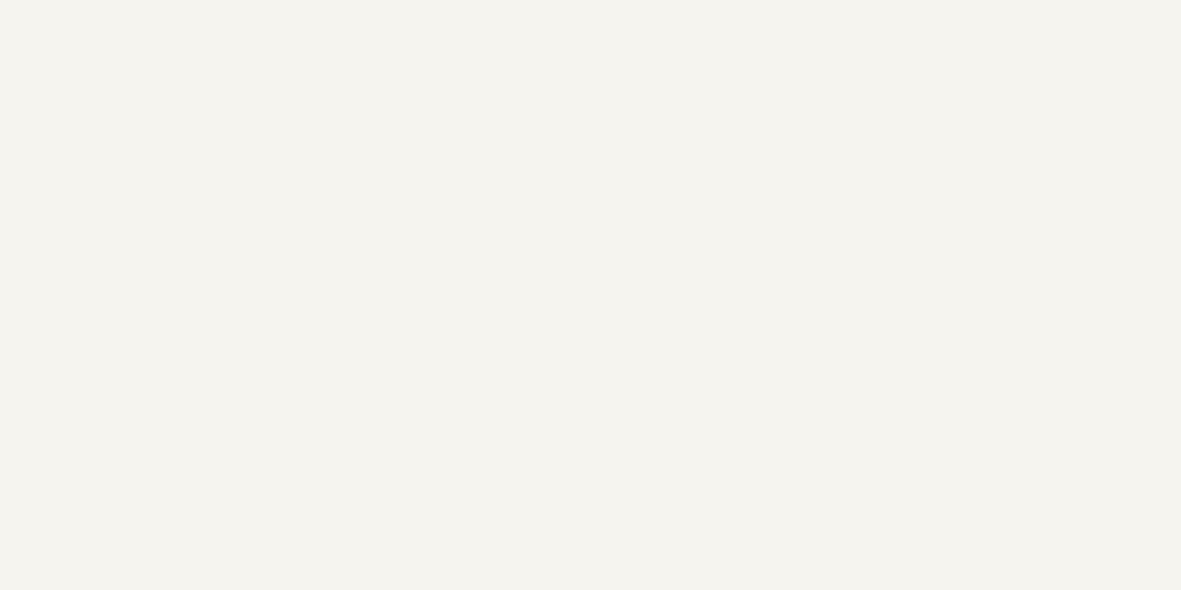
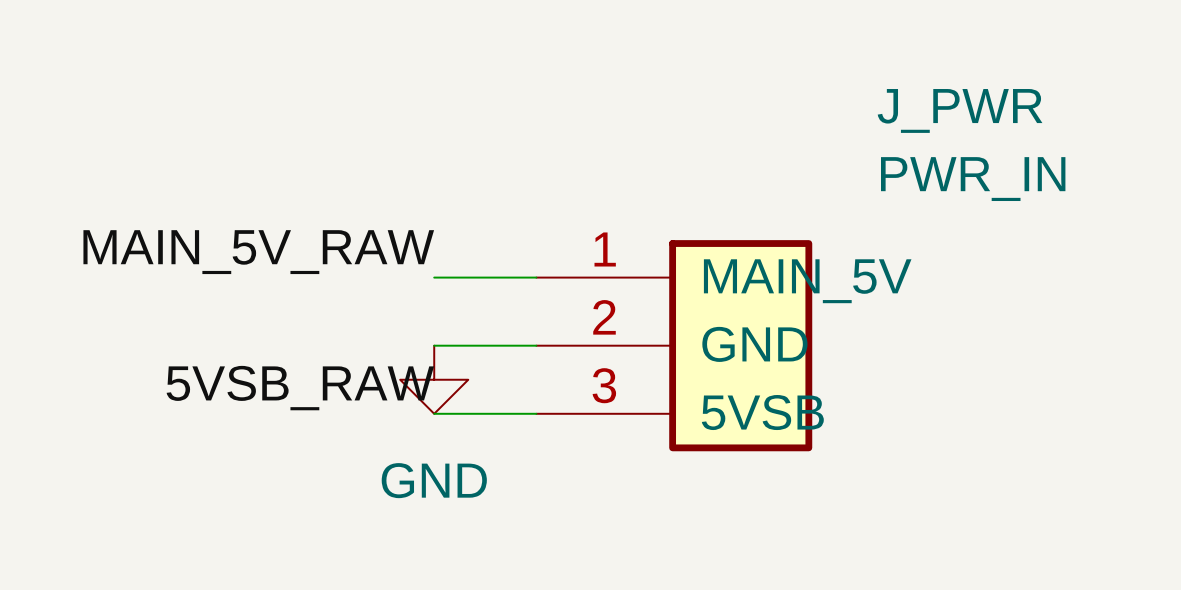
label: none -> MAIN_5V_RAW (258, 252)
wire: none -> (434, 277) (536, 277)
wire: none -> (434, 345) (536, 345)
J_PWR: none -> PWR_IN (674, 345)
power symbol: none -> GND (434, 379)
label: none -> 5VSB_RAW (300, 388)
wire: none -> (434, 413) (536, 413)

